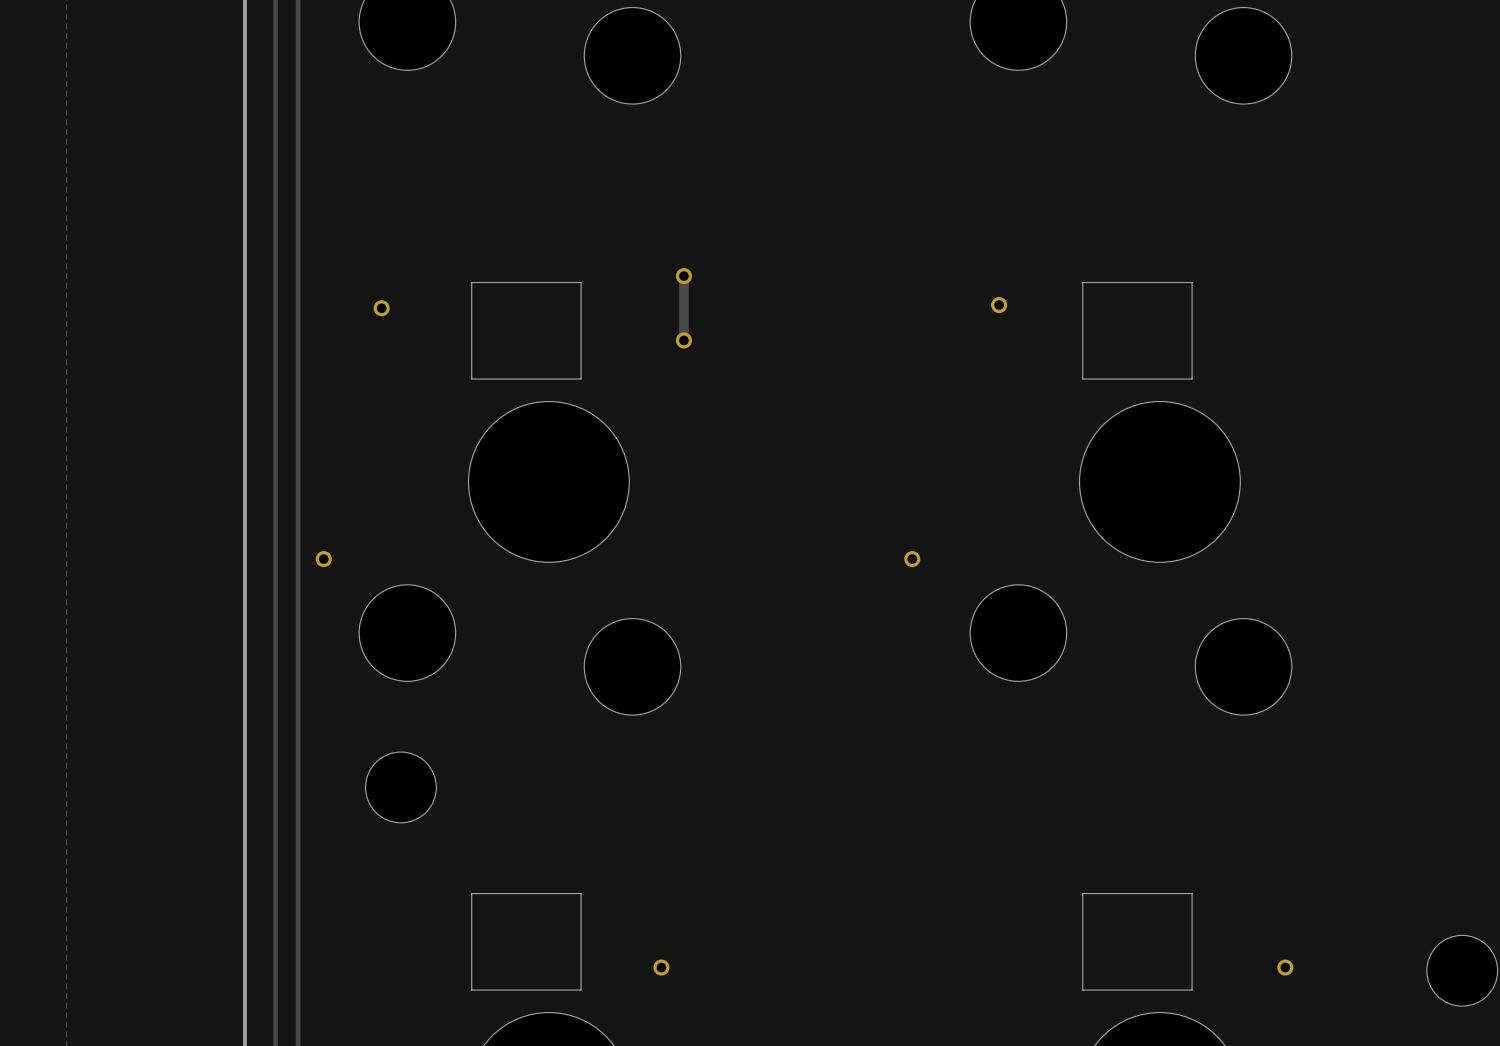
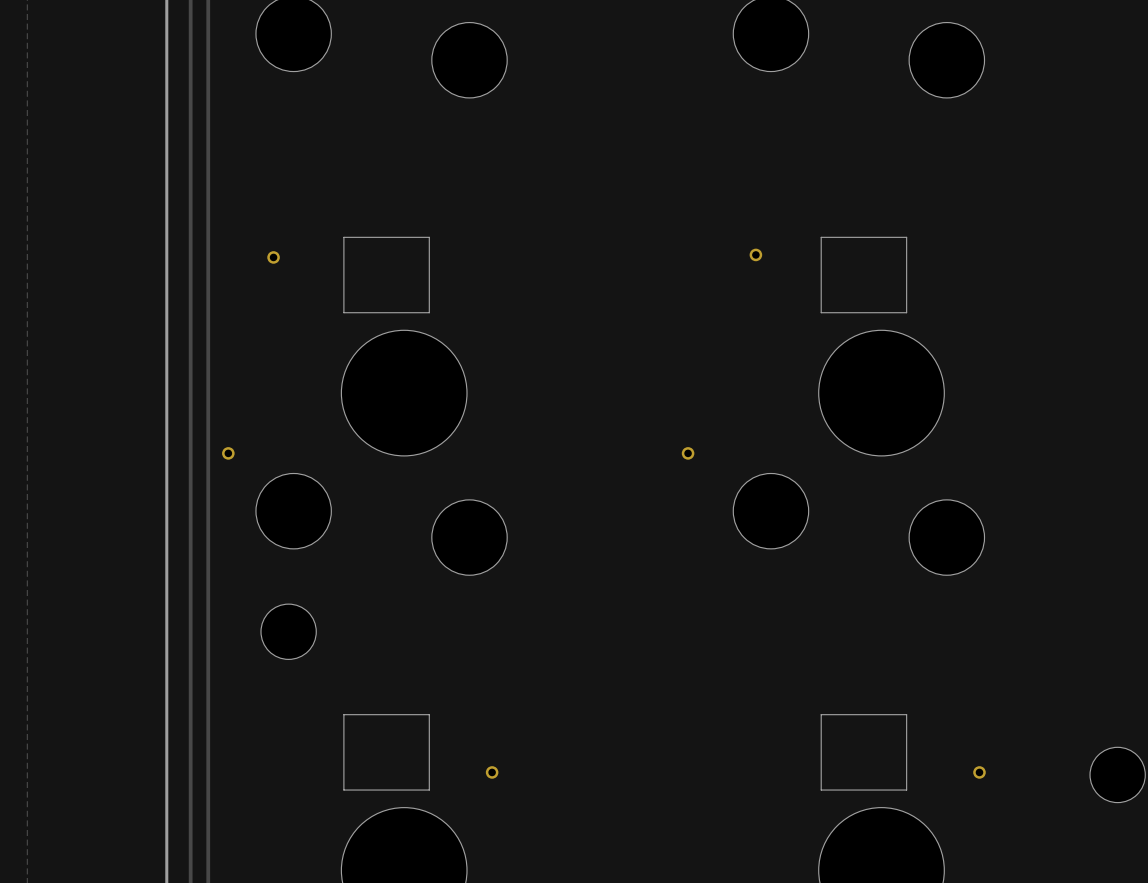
track: (683, 276) (683, 340) -> none
via: (683, 276) -> none
via: (683, 340) -> none

